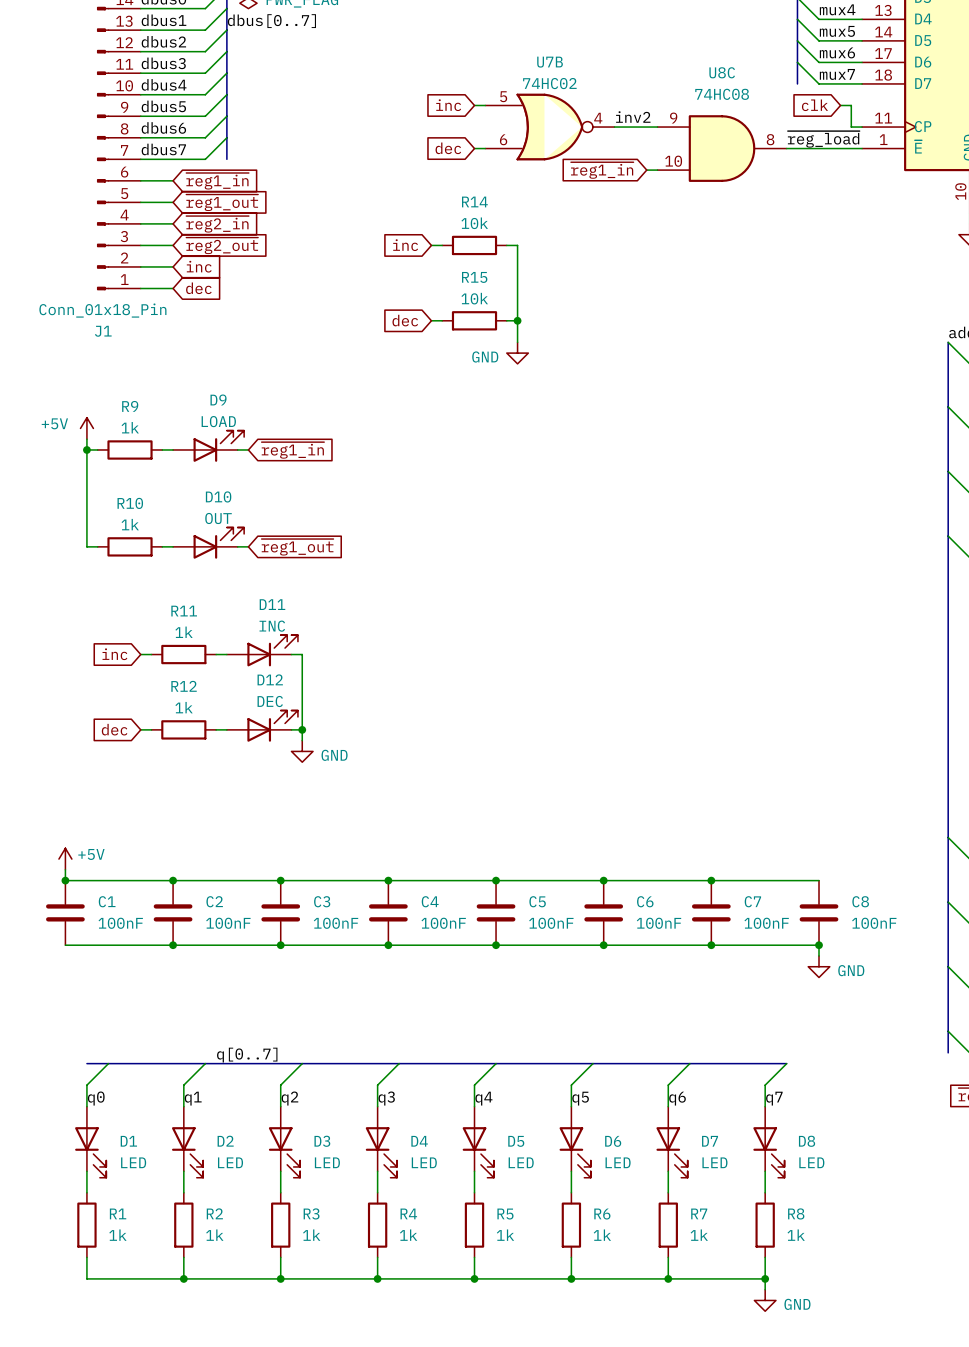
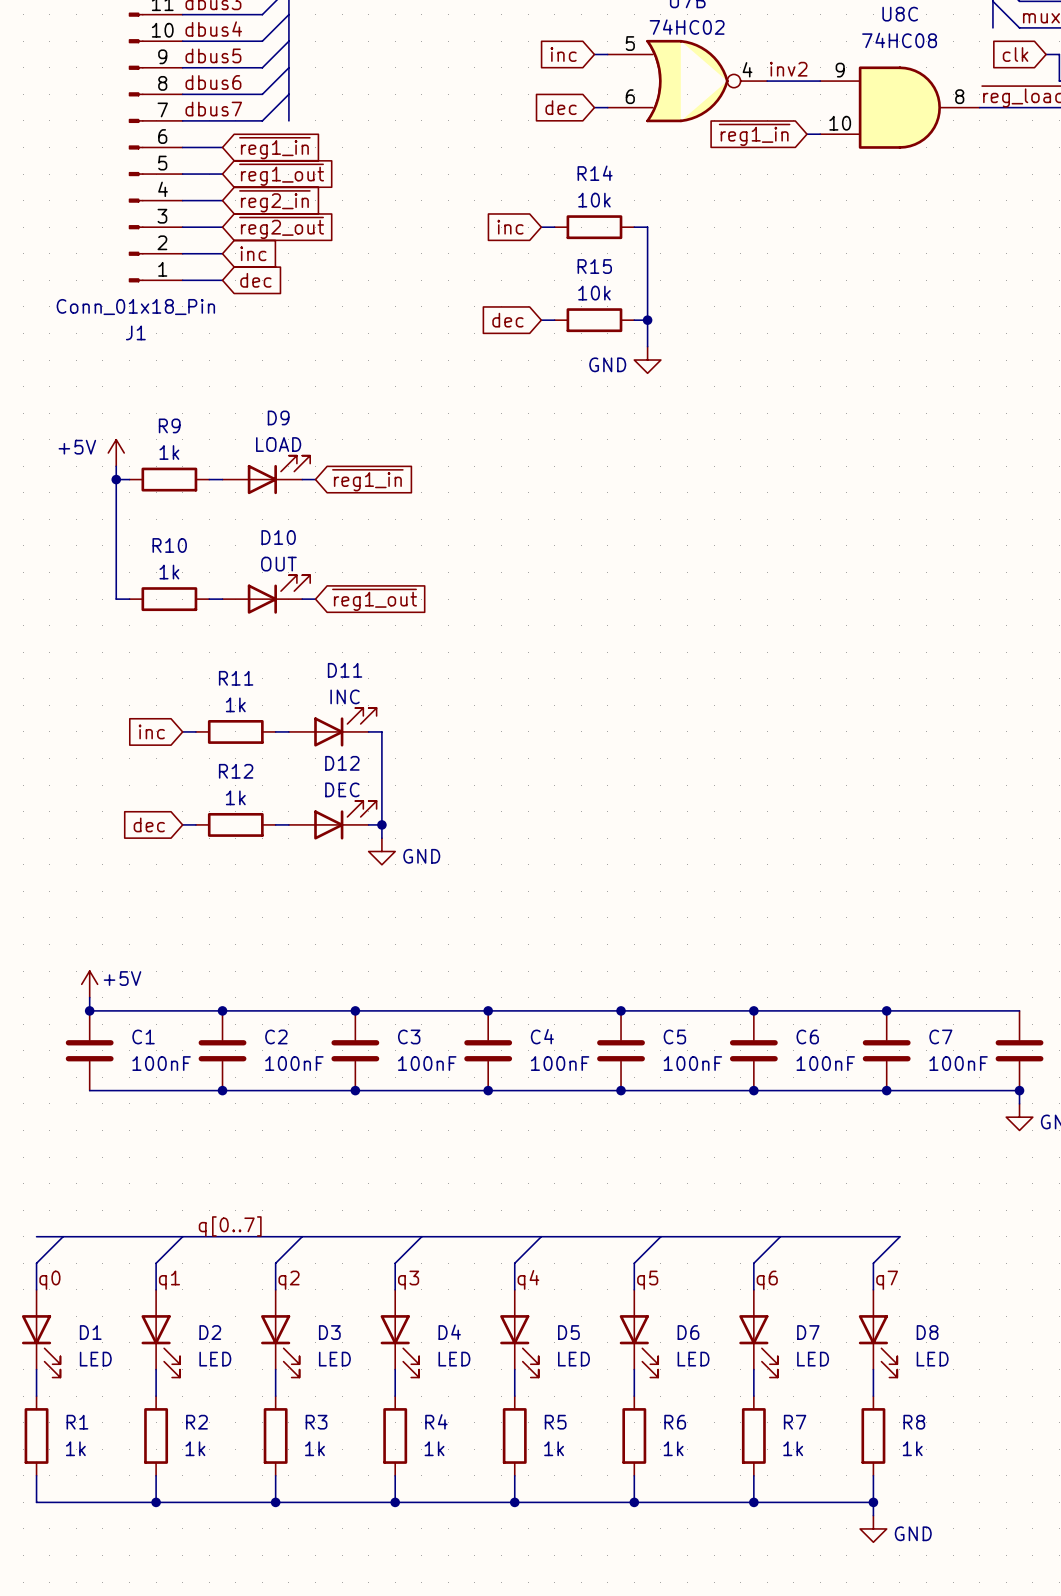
label position: q[0..7] (247, 1055) -> q[0..7] (230, 1226)
bus: none -> (36, 1236) (116, 1236)
wire: (108, 1063) (86, 1085) (86, 1106) -> (63, 1236) (36, 1263) (36, 1289)
wire: (205, 1063) (183, 1085) (183, 1106) -> (182, 1236) (156, 1263) (156, 1289)
wire: (302, 1063) (280, 1085) (280, 1106) -> (302, 1236) (275, 1263) (275, 1289)
wire: (399, 1063) (377, 1085) (377, 1106) -> (421, 1236) (395, 1263) (395, 1289)
wire: (496, 1063) (474, 1085) (474, 1106) -> (541, 1236) (514, 1263) (514, 1289)
wire: (592, 1063) (571, 1085) (571, 1106) -> (660, 1236) (634, 1263) (634, 1289)
wire: (689, 1063) (668, 1085) (668, 1106) -> (780, 1236) (753, 1263) (753, 1289)
bus: (722, 1063) (786, 1063) -> none
wire: (786, 1063) (765, 1085) (765, 1106) -> (899, 1236) (873, 1263) (873, 1289)
label position: q0 (96, 1098) -> q0 (49, 1280)
label position: q1 (193, 1098) -> q1 (169, 1280)
label position: q2 (289, 1098) -> q2 (289, 1280)
label position: q3 (386, 1098) -> q3 (408, 1280)
label position: q4 (483, 1098) -> q4 (528, 1279)
label position: q5 (580, 1098) -> q5 (647, 1280)
label position: q6 (677, 1098) -> q6 (767, 1280)
label position: q7 (774, 1098) -> q7 (887, 1280)
D1 position: (90, 1142) -> (41, 1333)
D2 position: (187, 1142) -> (160, 1333)
D3 position: (284, 1142) -> (280, 1333)
D4 position: (381, 1142) -> (399, 1333)
D5 position: (478, 1142) -> (519, 1333)
D6 position: (575, 1142) -> (638, 1333)
D7 position: (672, 1142) -> (758, 1333)
D8 position: (768, 1142) -> (878, 1333)
wire: (86, 1171) (86, 1192) -> (36, 1369) (36, 1396)
wire: (183, 1171) (183, 1192) -> (156, 1369) (156, 1396)
wire: (280, 1171) (280, 1192) -> (275, 1369) (275, 1396)
wire: (377, 1171) (377, 1192) -> (395, 1369) (395, 1396)
wire: (474, 1171) (474, 1192) -> (514, 1369) (514, 1396)
wire: (571, 1171) (571, 1192) -> (634, 1369) (634, 1396)
wire: (668, 1171) (668, 1192) -> (753, 1369) (753, 1396)
wire: (765, 1171) (765, 1192) -> (873, 1369) (873, 1396)
R1 position: (86, 1225) -> (36, 1435)
R2 position: (183, 1225) -> (156, 1435)
R3 position: (280, 1225) -> (275, 1435)
R4 position: (377, 1225) -> (395, 1435)
R5 position: (474, 1225) -> (514, 1435)
R6 position: (571, 1225) -> (634, 1435)
R7 position: (668, 1225) -> (753, 1435)
R8 position: (765, 1225) -> (873, 1435)
wire: (86, 1257) (86, 1278) -> (36, 1475) (36, 1502) (116, 1502)
wire: (183, 1257) (183, 1278) -> (156, 1475) (156, 1502)
wire: (280, 1257) (280, 1278) -> (275, 1475) (275, 1502)
wire: (377, 1257) (377, 1278) -> (395, 1475) (395, 1502)
wire: (474, 1257) (474, 1278) -> (514, 1475) (514, 1502)
wire: (571, 1257) (571, 1278) -> (634, 1475) (634, 1502)
wire: (668, 1257) (668, 1278) -> (753, 1475) (753, 1502)
wire: (765, 1257) (765, 1289) -> (873, 1475) (873, 1515)
junction: none -> (156, 1502)
junction: (183, 1278) -> none
junction: none -> (275, 1502)
junction: (280, 1278) -> none
junction: none -> (395, 1502)
junction: (377, 1278) -> none
junction: none -> (514, 1502)
junction: (474, 1278) -> none
junction: none -> (634, 1502)
junction: (571, 1278) -> none
junction: none -> (753, 1502)
junction: (668, 1278) -> none
wire: (700, 1278) (765, 1278) -> none
junction: none -> (873, 1502)
junction: (765, 1278) -> none
power symbol position: GND (765, 1300) -> GND (873, 1528)

